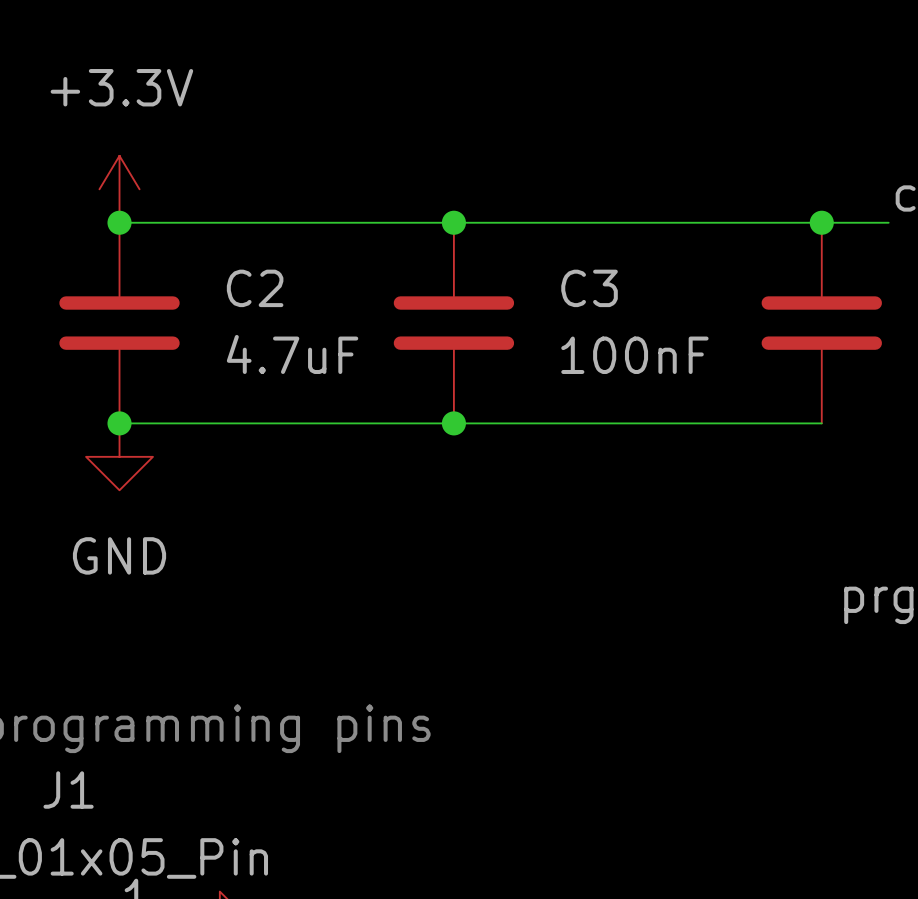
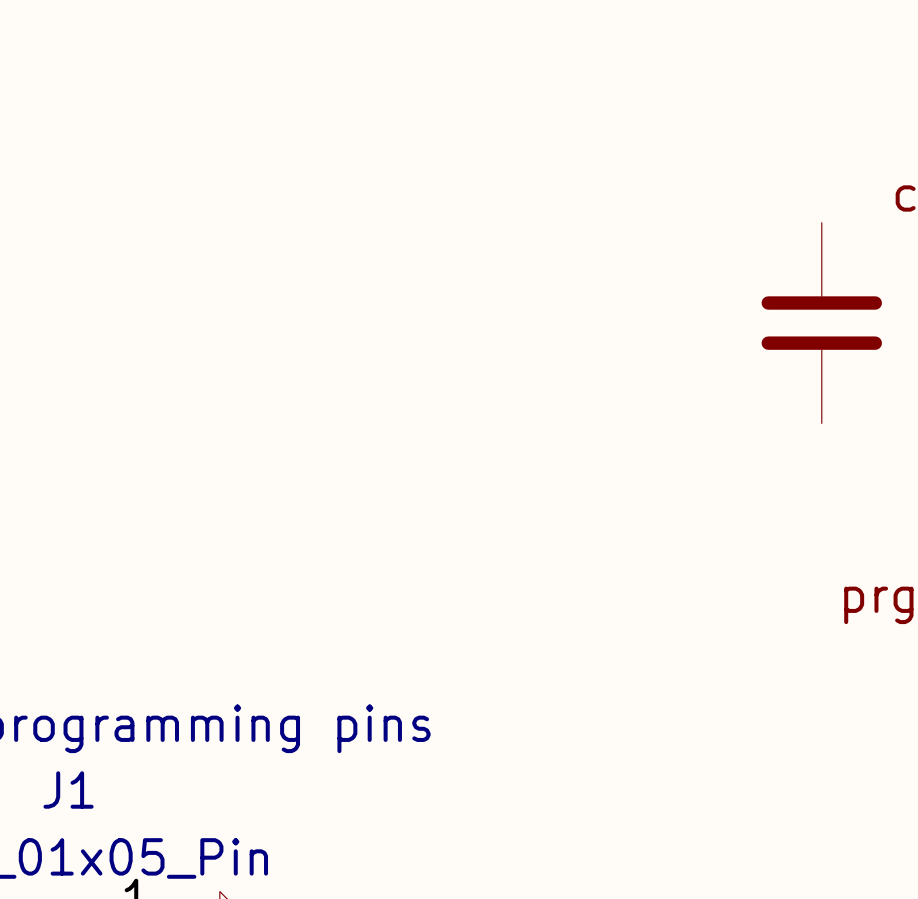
power symbol: +3.3V (119, 189) -> none
wire: (119, 222) (888, 222) -> none
junction: (119, 222) -> none
junction: (453, 222) -> none
junction: (821, 222) -> none
C2: 4.7uF (119, 323) -> none
C3: 100nF (453, 323) -> none
wire: (119, 423) (821, 423) -> none
junction: (119, 423) -> none
junction: (453, 423) -> none
power symbol: GND (119, 456) -> none

